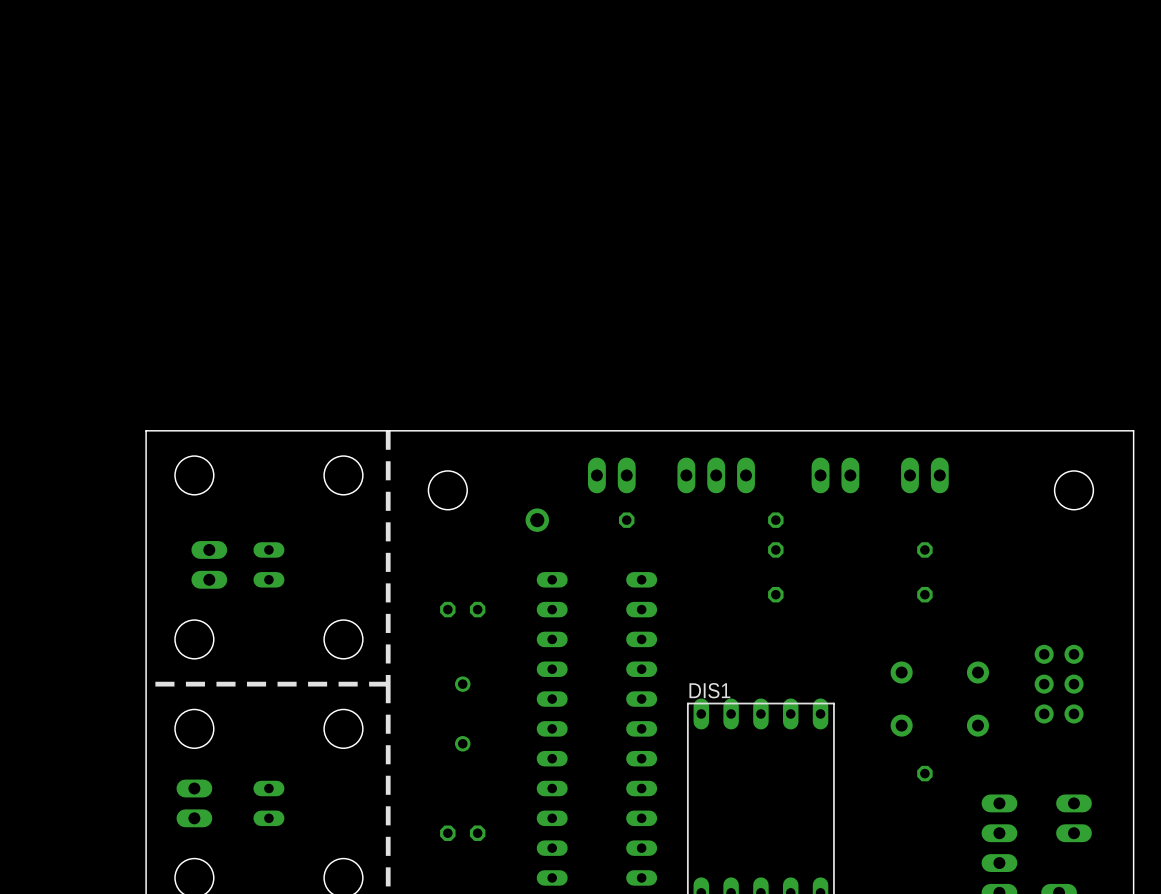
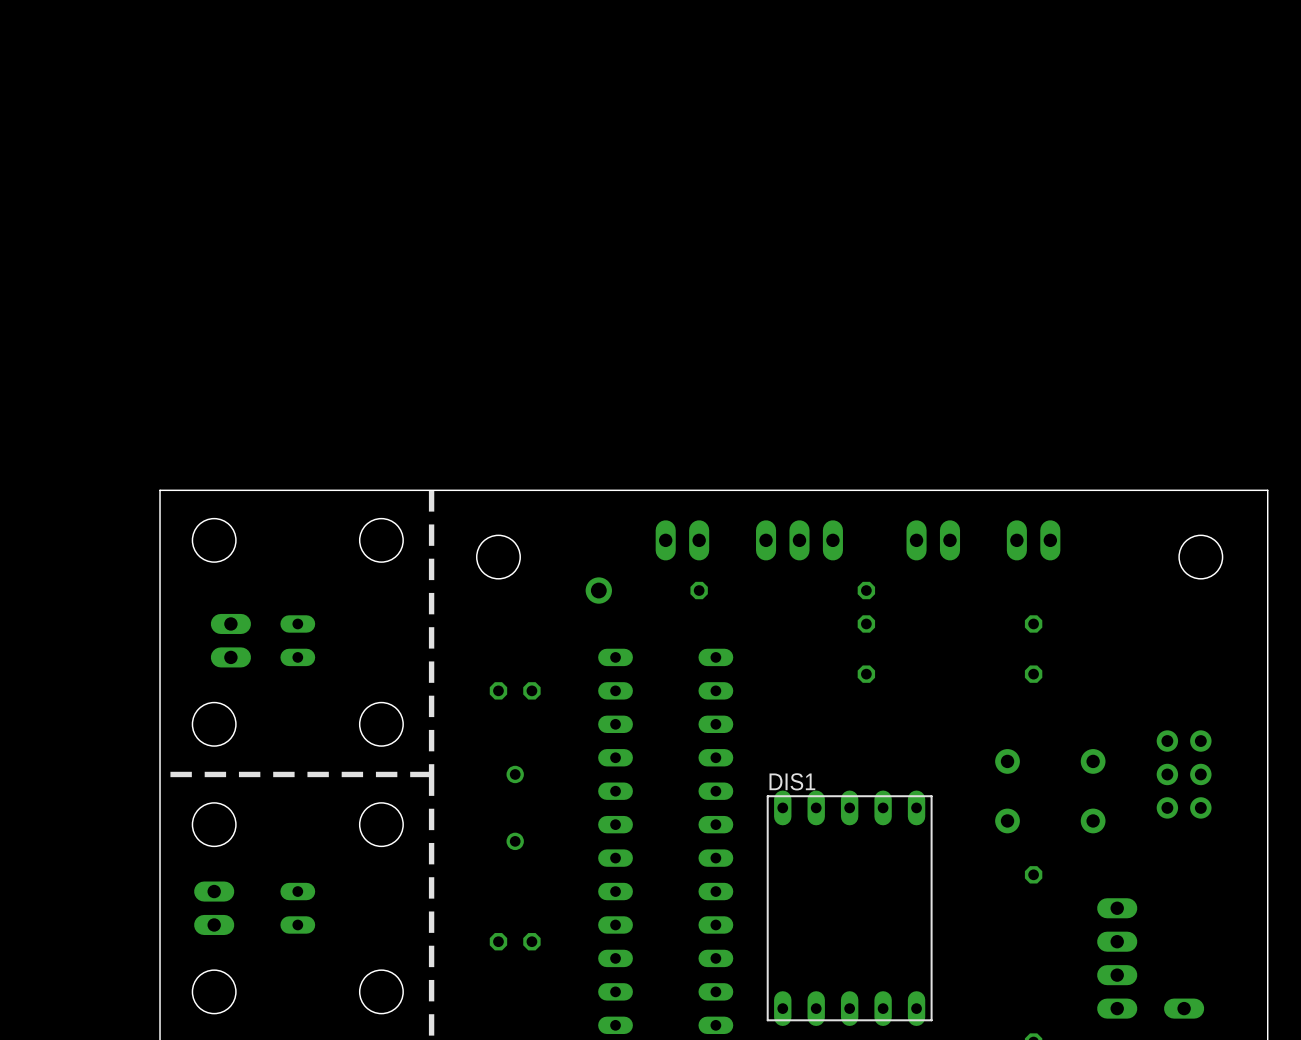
part: (1073, 818) -> none

